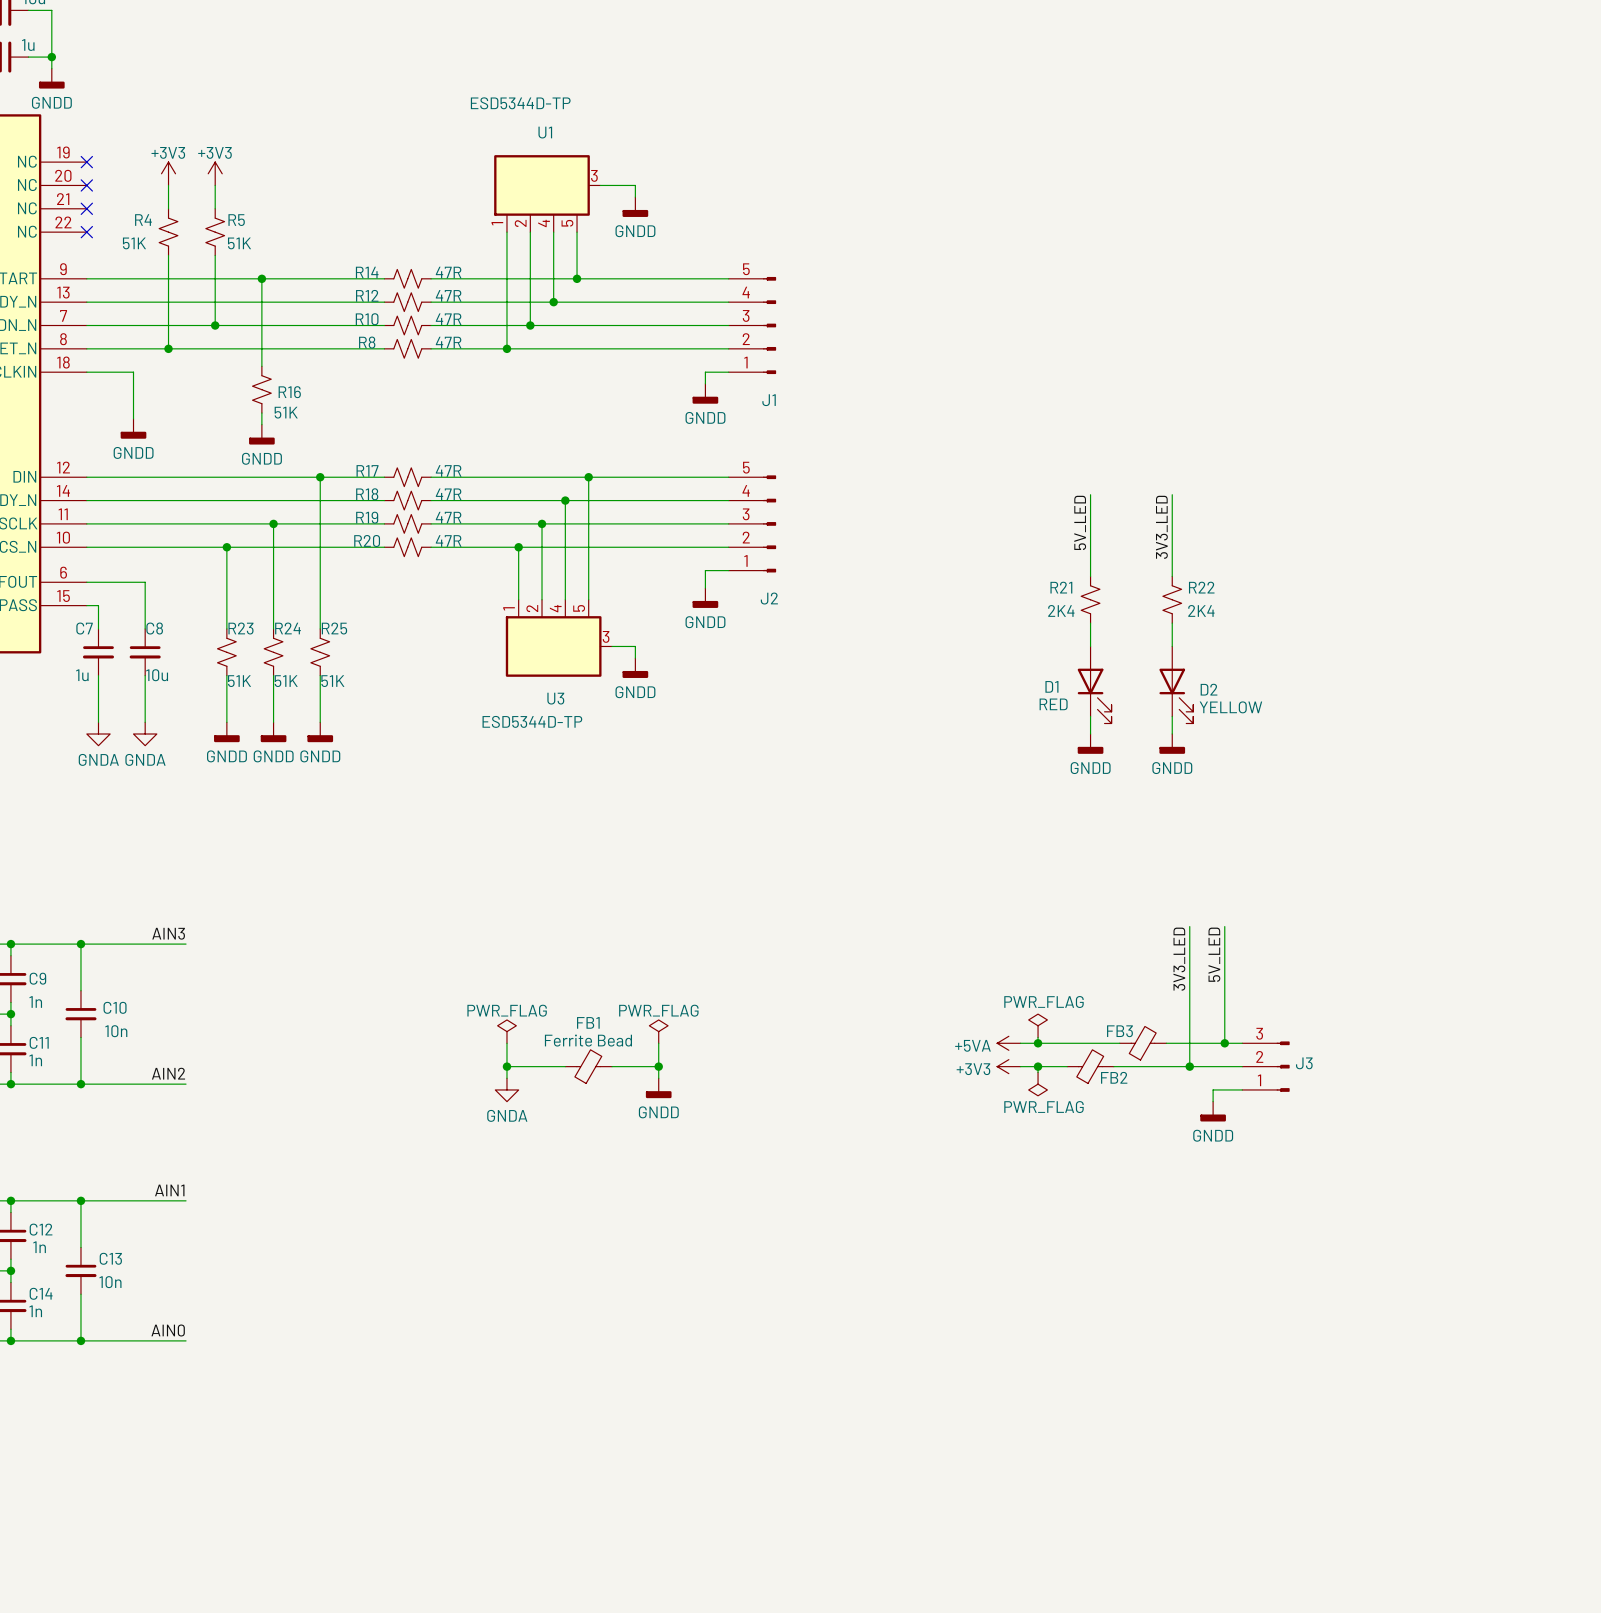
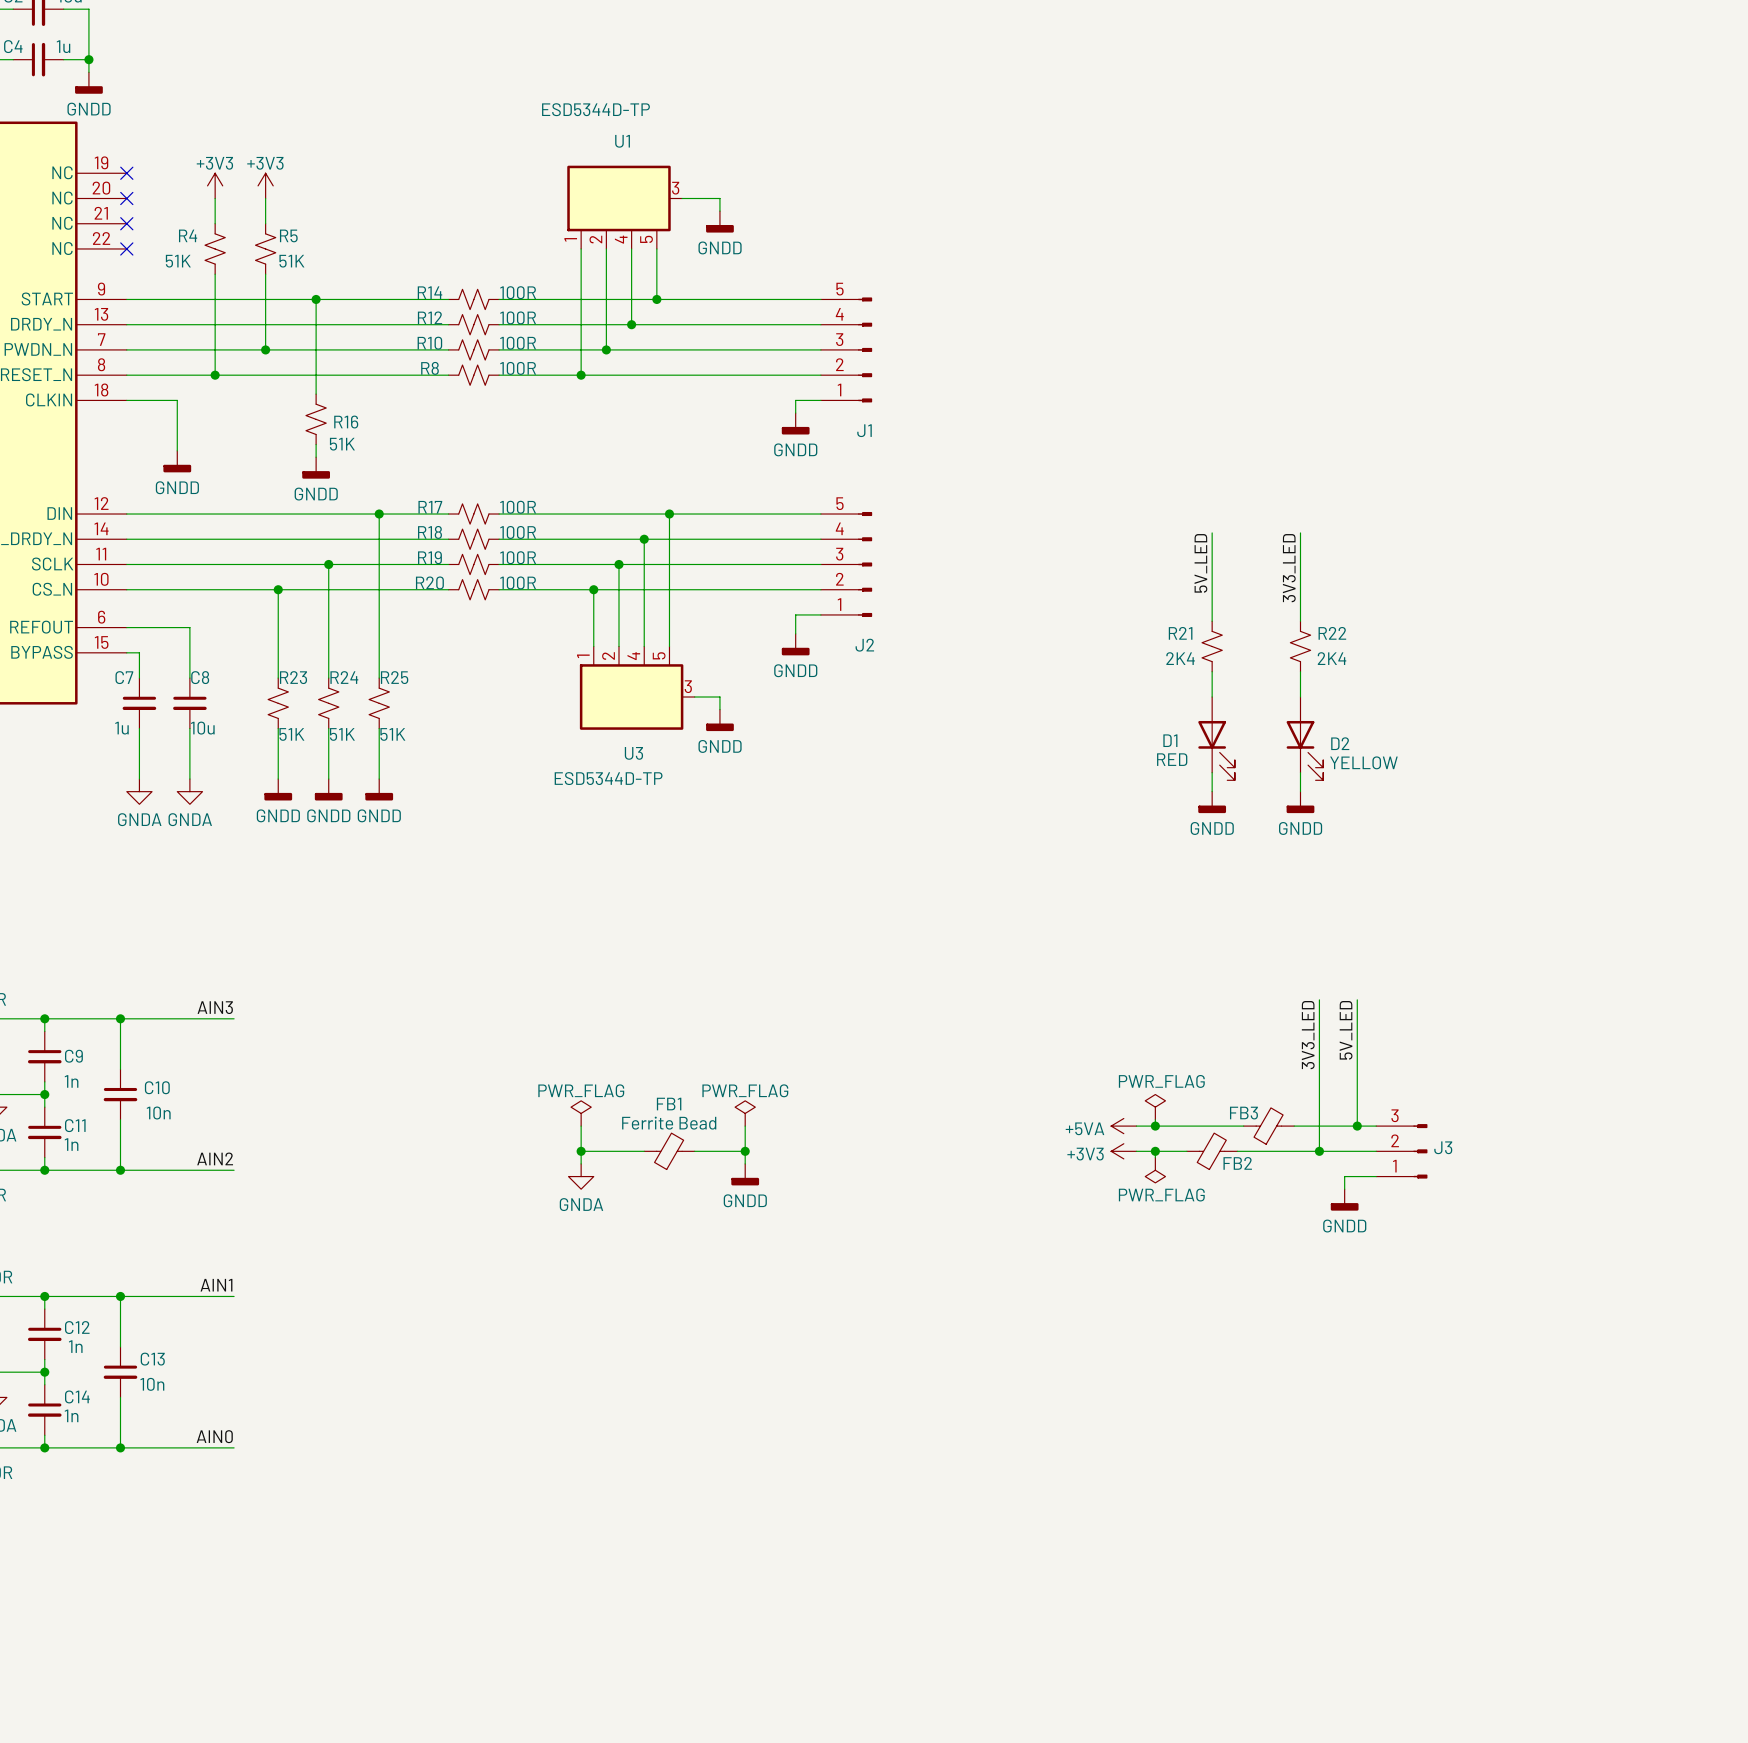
R14 value: 47R (448, 272) -> 100R (518, 292)
R12 value: 47R (448, 295) -> 100R (518, 317)
R10 value: 47R (448, 319) -> 100R (518, 343)
R8 value: 47R (448, 342) -> 100R (518, 368)
R17 value: 47R (448, 470) -> 100R (518, 507)
R18 value: 47R (448, 494) -> 100R (518, 532)
R19 value: 47R (448, 517) -> 100R (518, 557)
R20 value: 47R (448, 540) -> 100R (518, 582)

